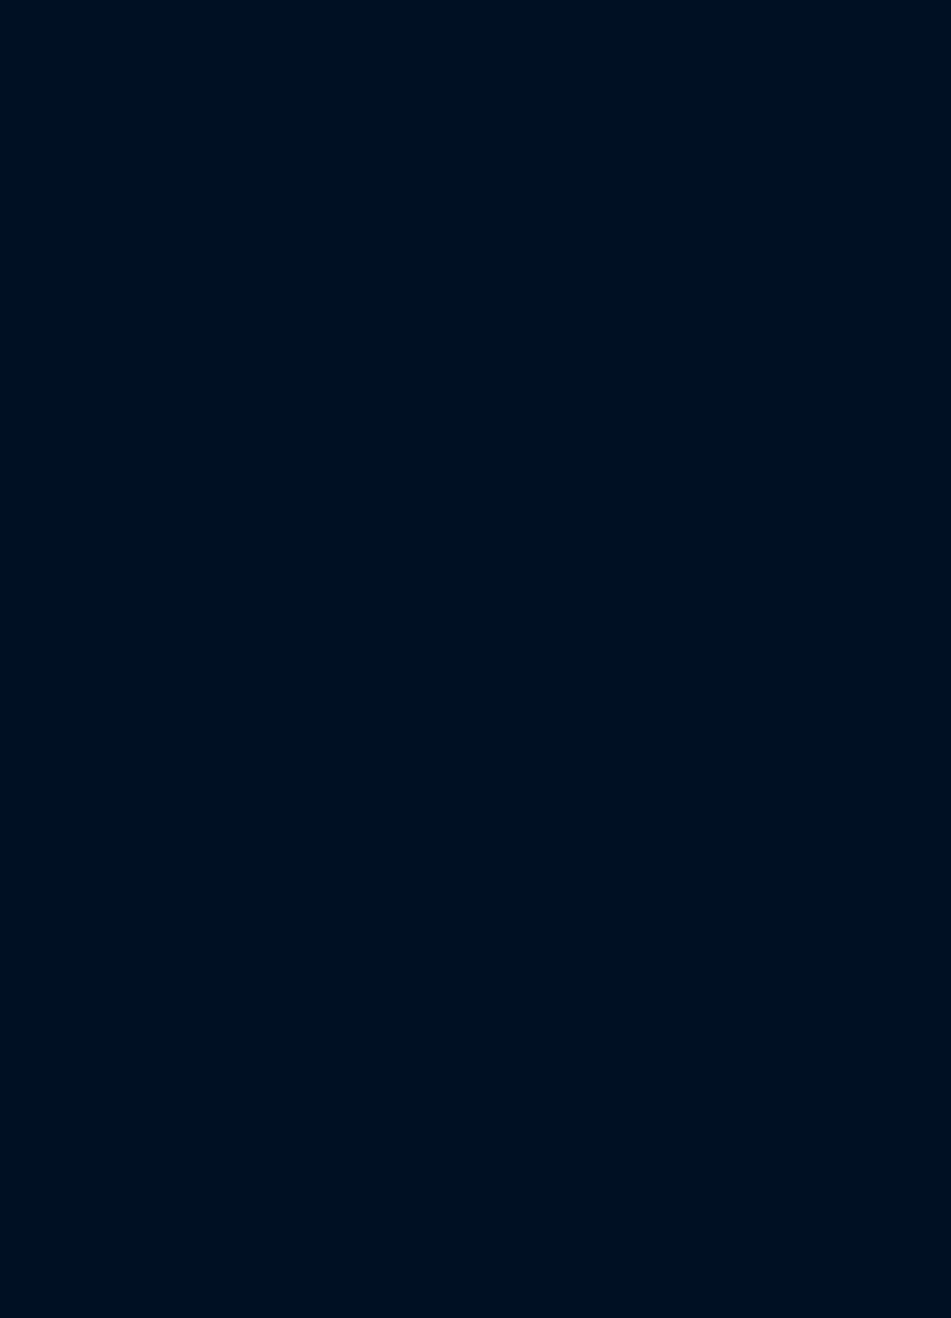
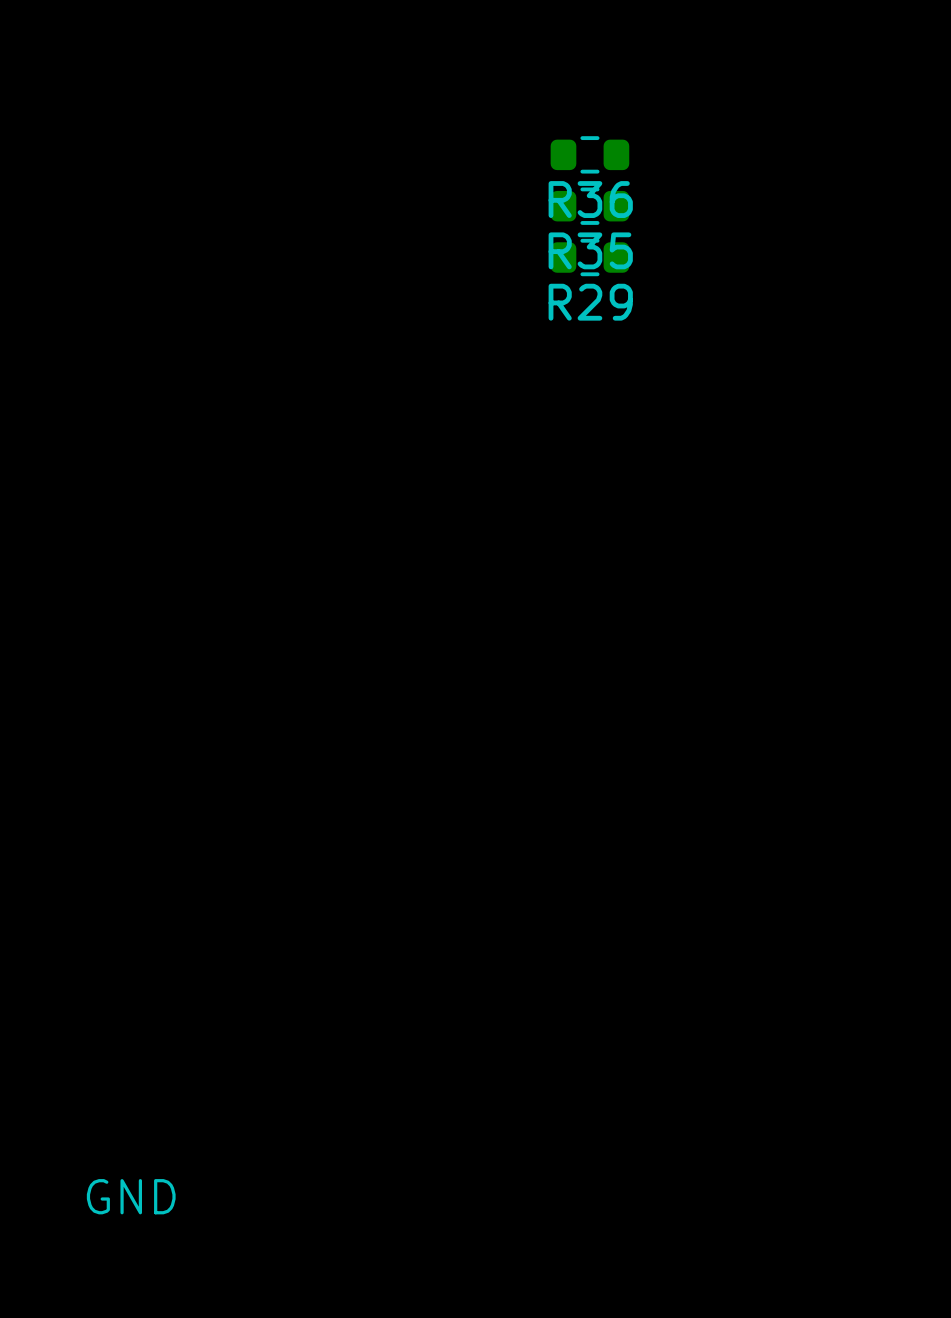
R36: none -> (589, 154)
R35: none -> (589, 206)
R29: none -> (589, 257)
text: none -> GND (131, 1196)

